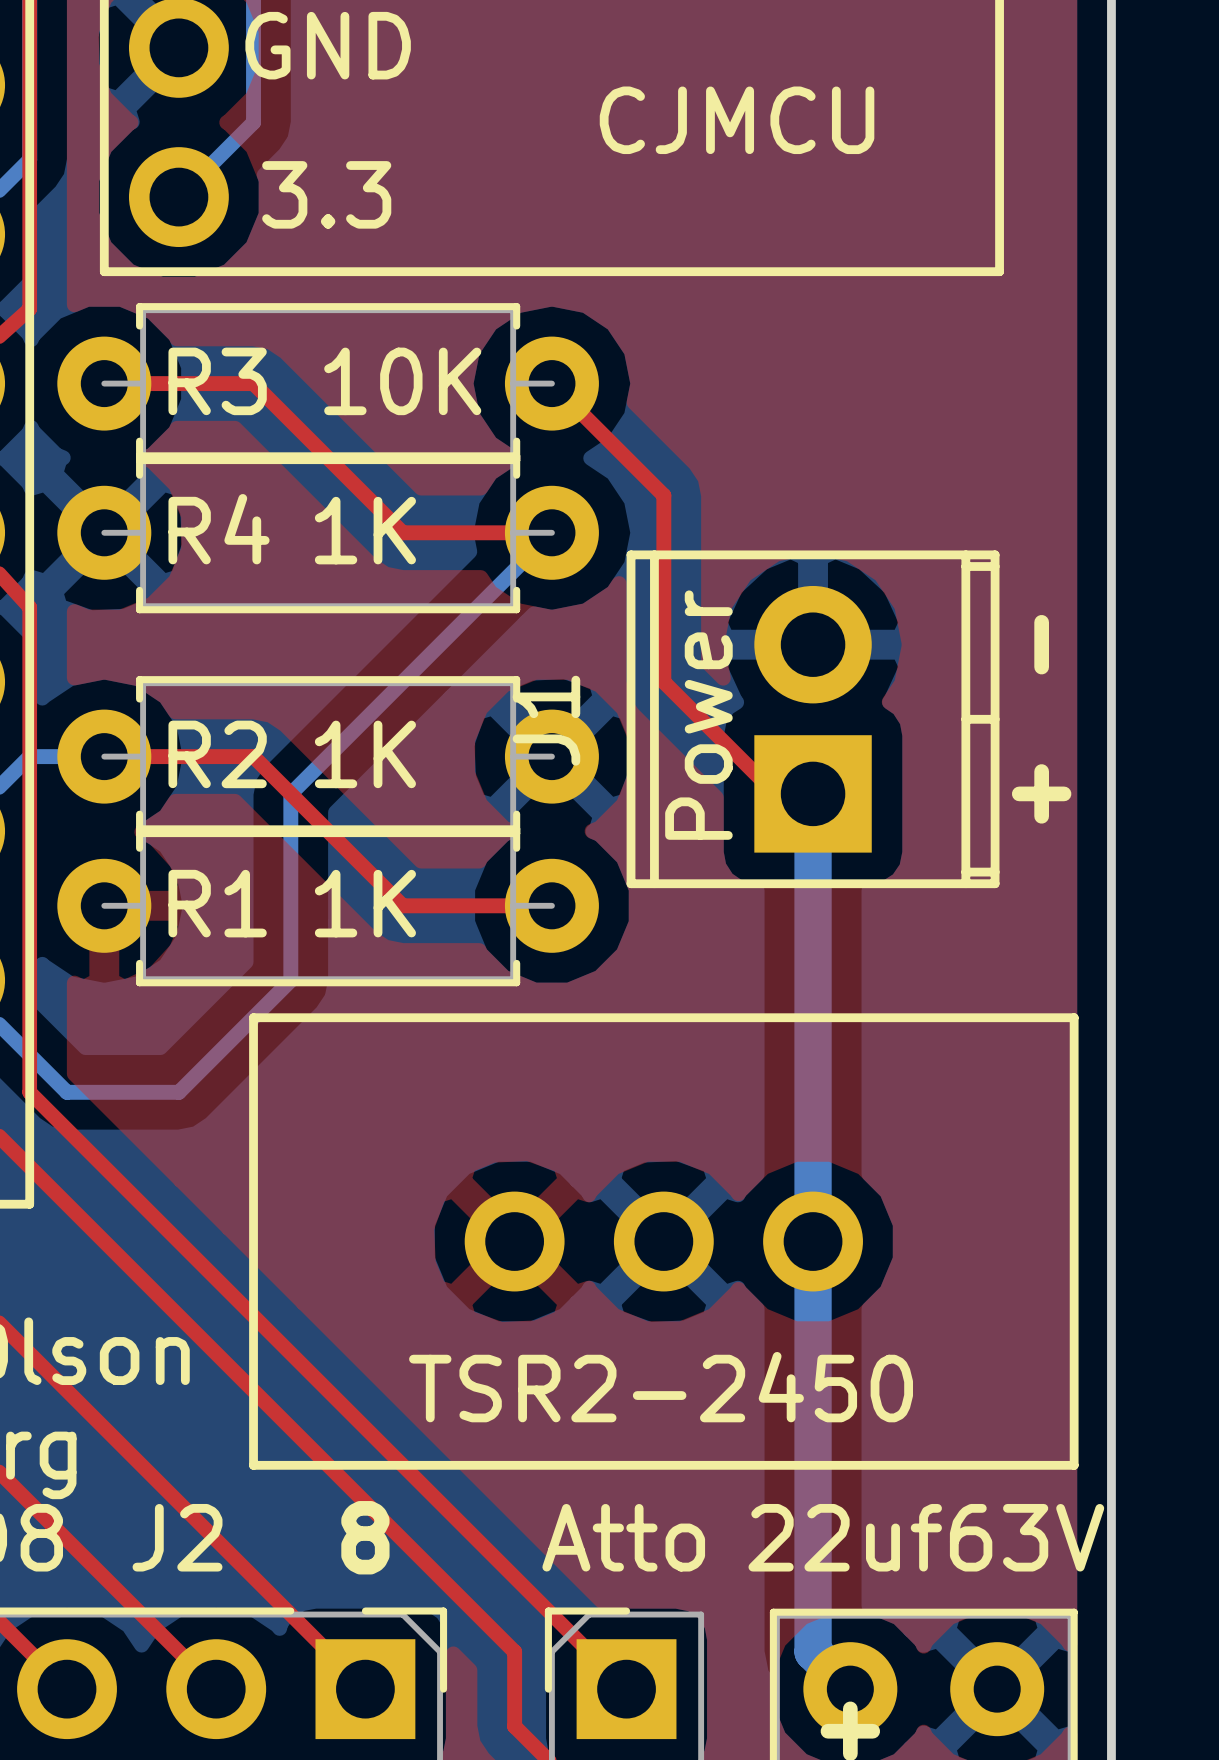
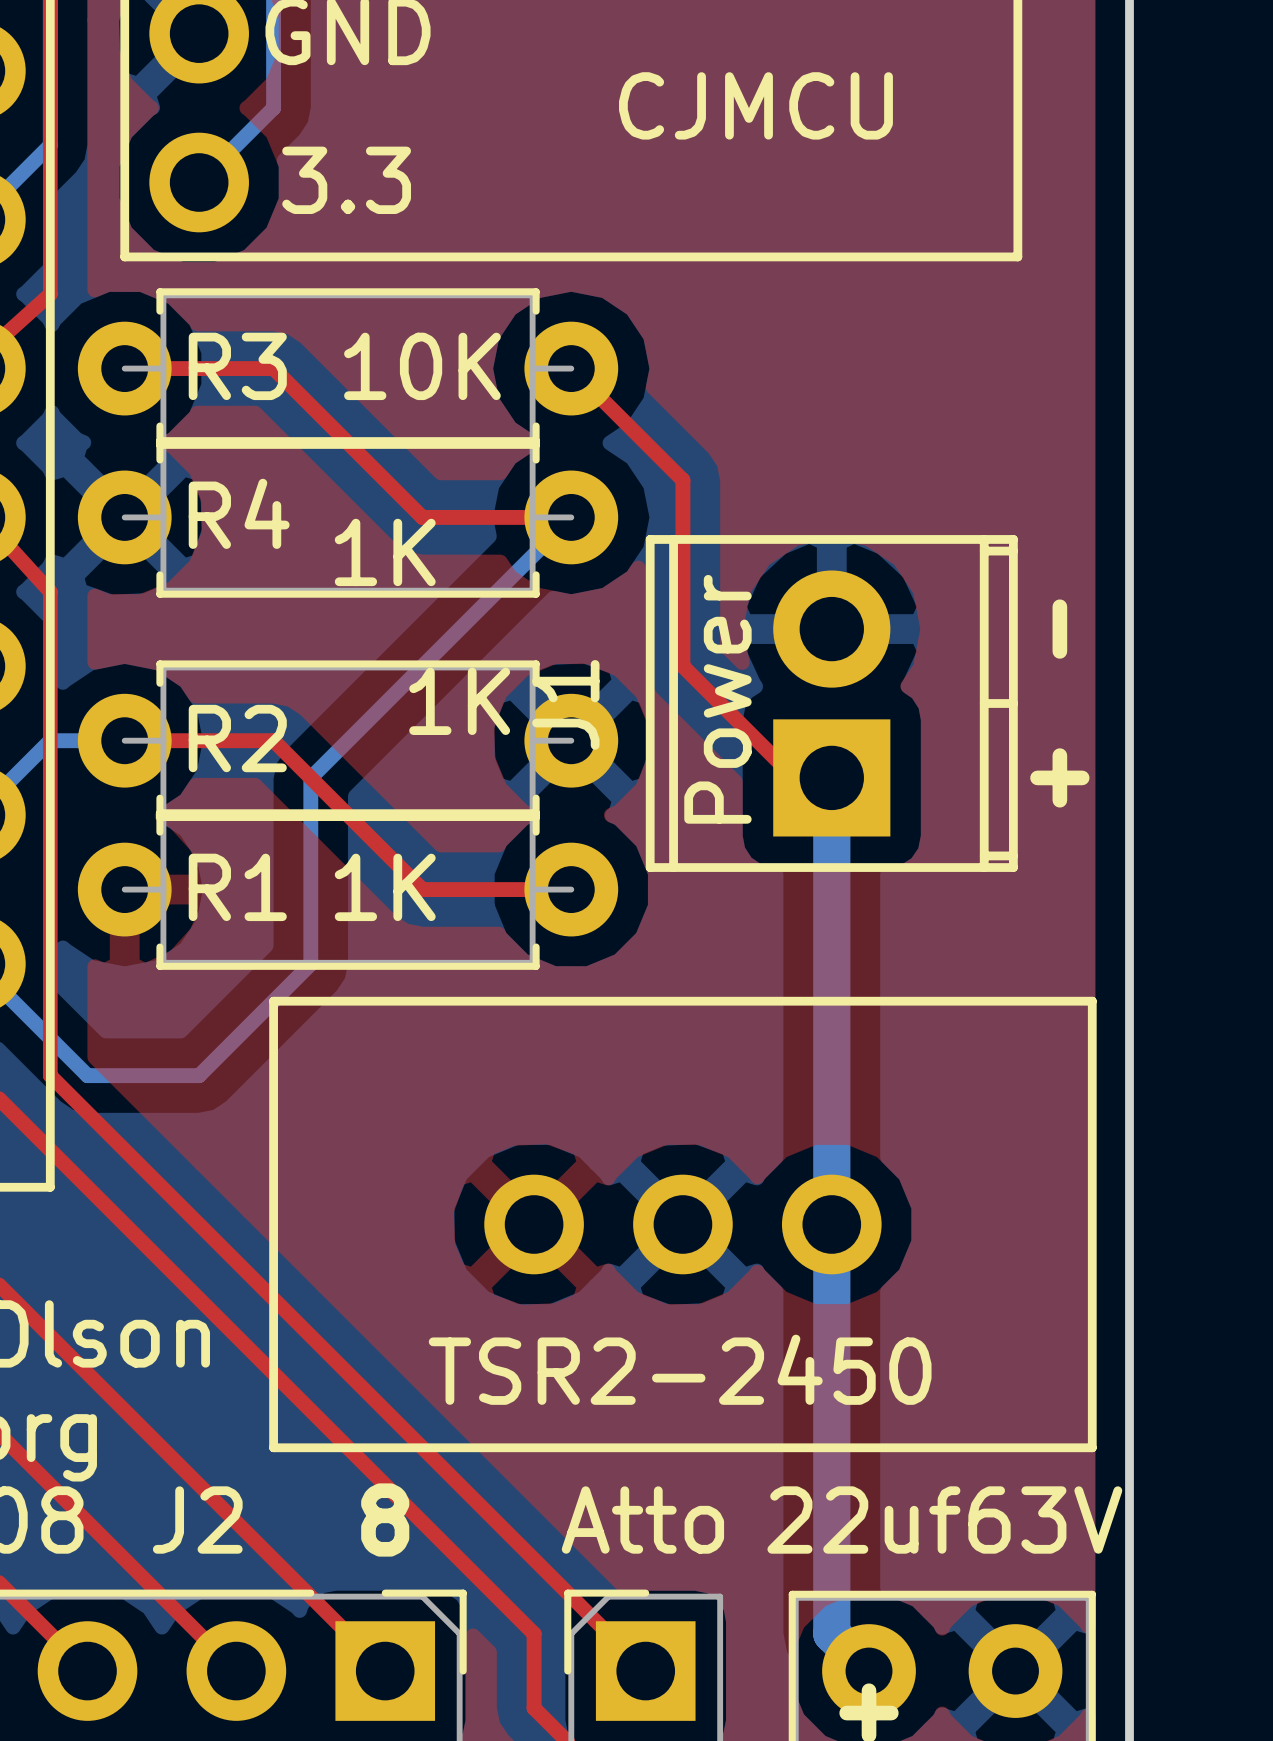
R2 value position: 1K (365, 530) -> 1K (385, 552)
R4 value position: 1K (365, 754) -> 1K (459, 701)

